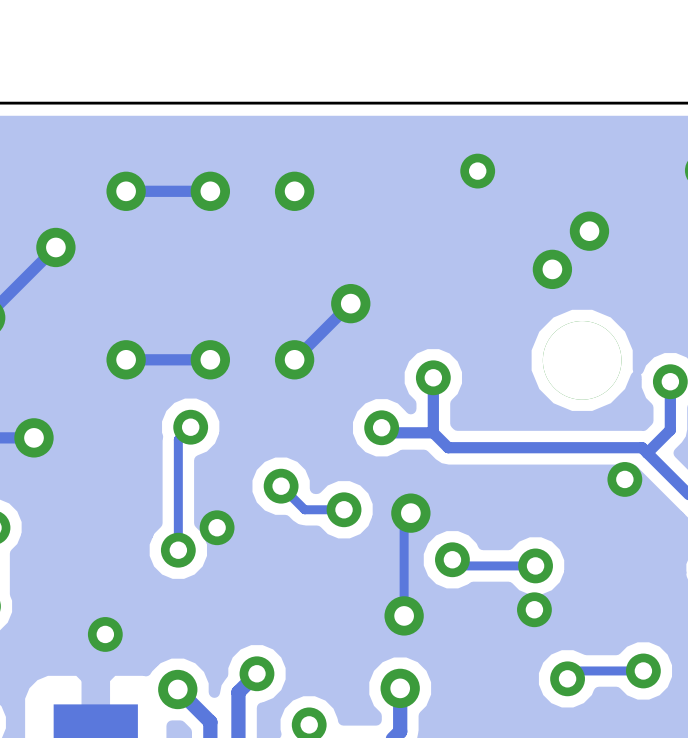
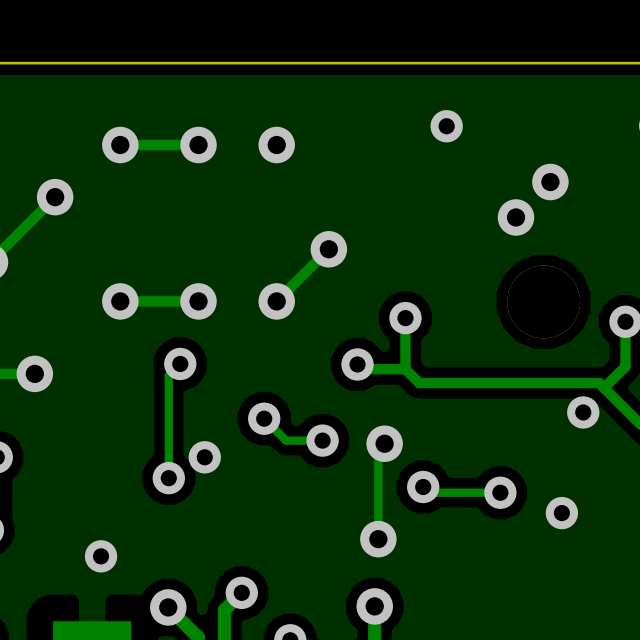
via: none -> (561, 513)
via: (534, 609) -> none
track: (643, 670) (575, 670) (567, 678) -> none
via: (643, 670) -> none
via: (567, 678) -> none

